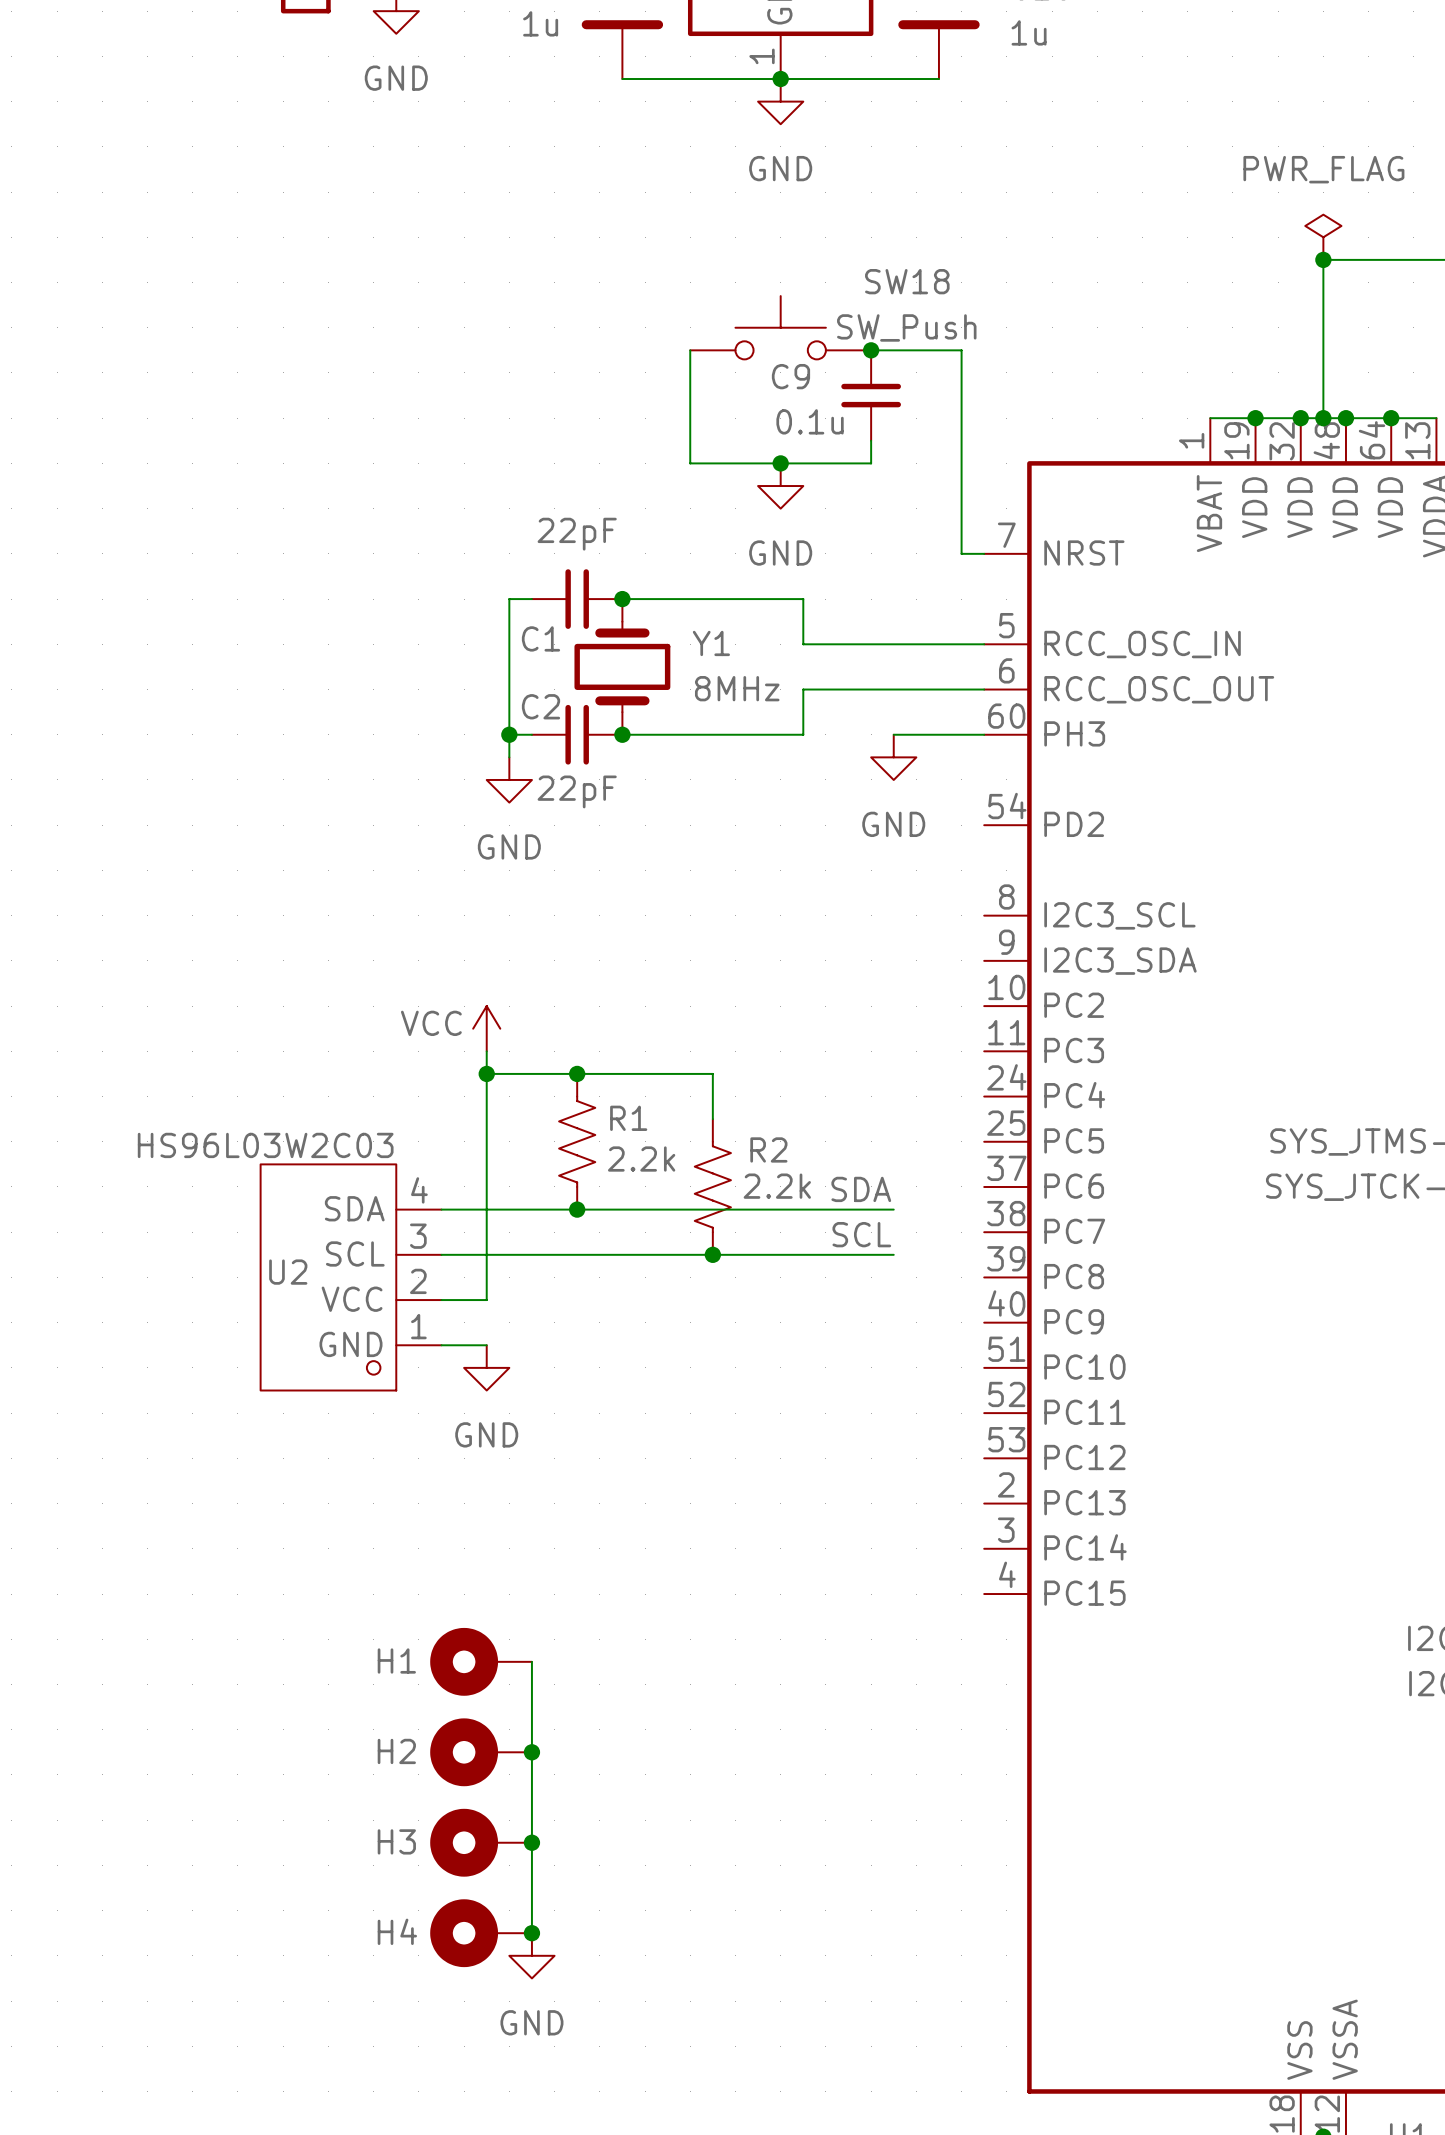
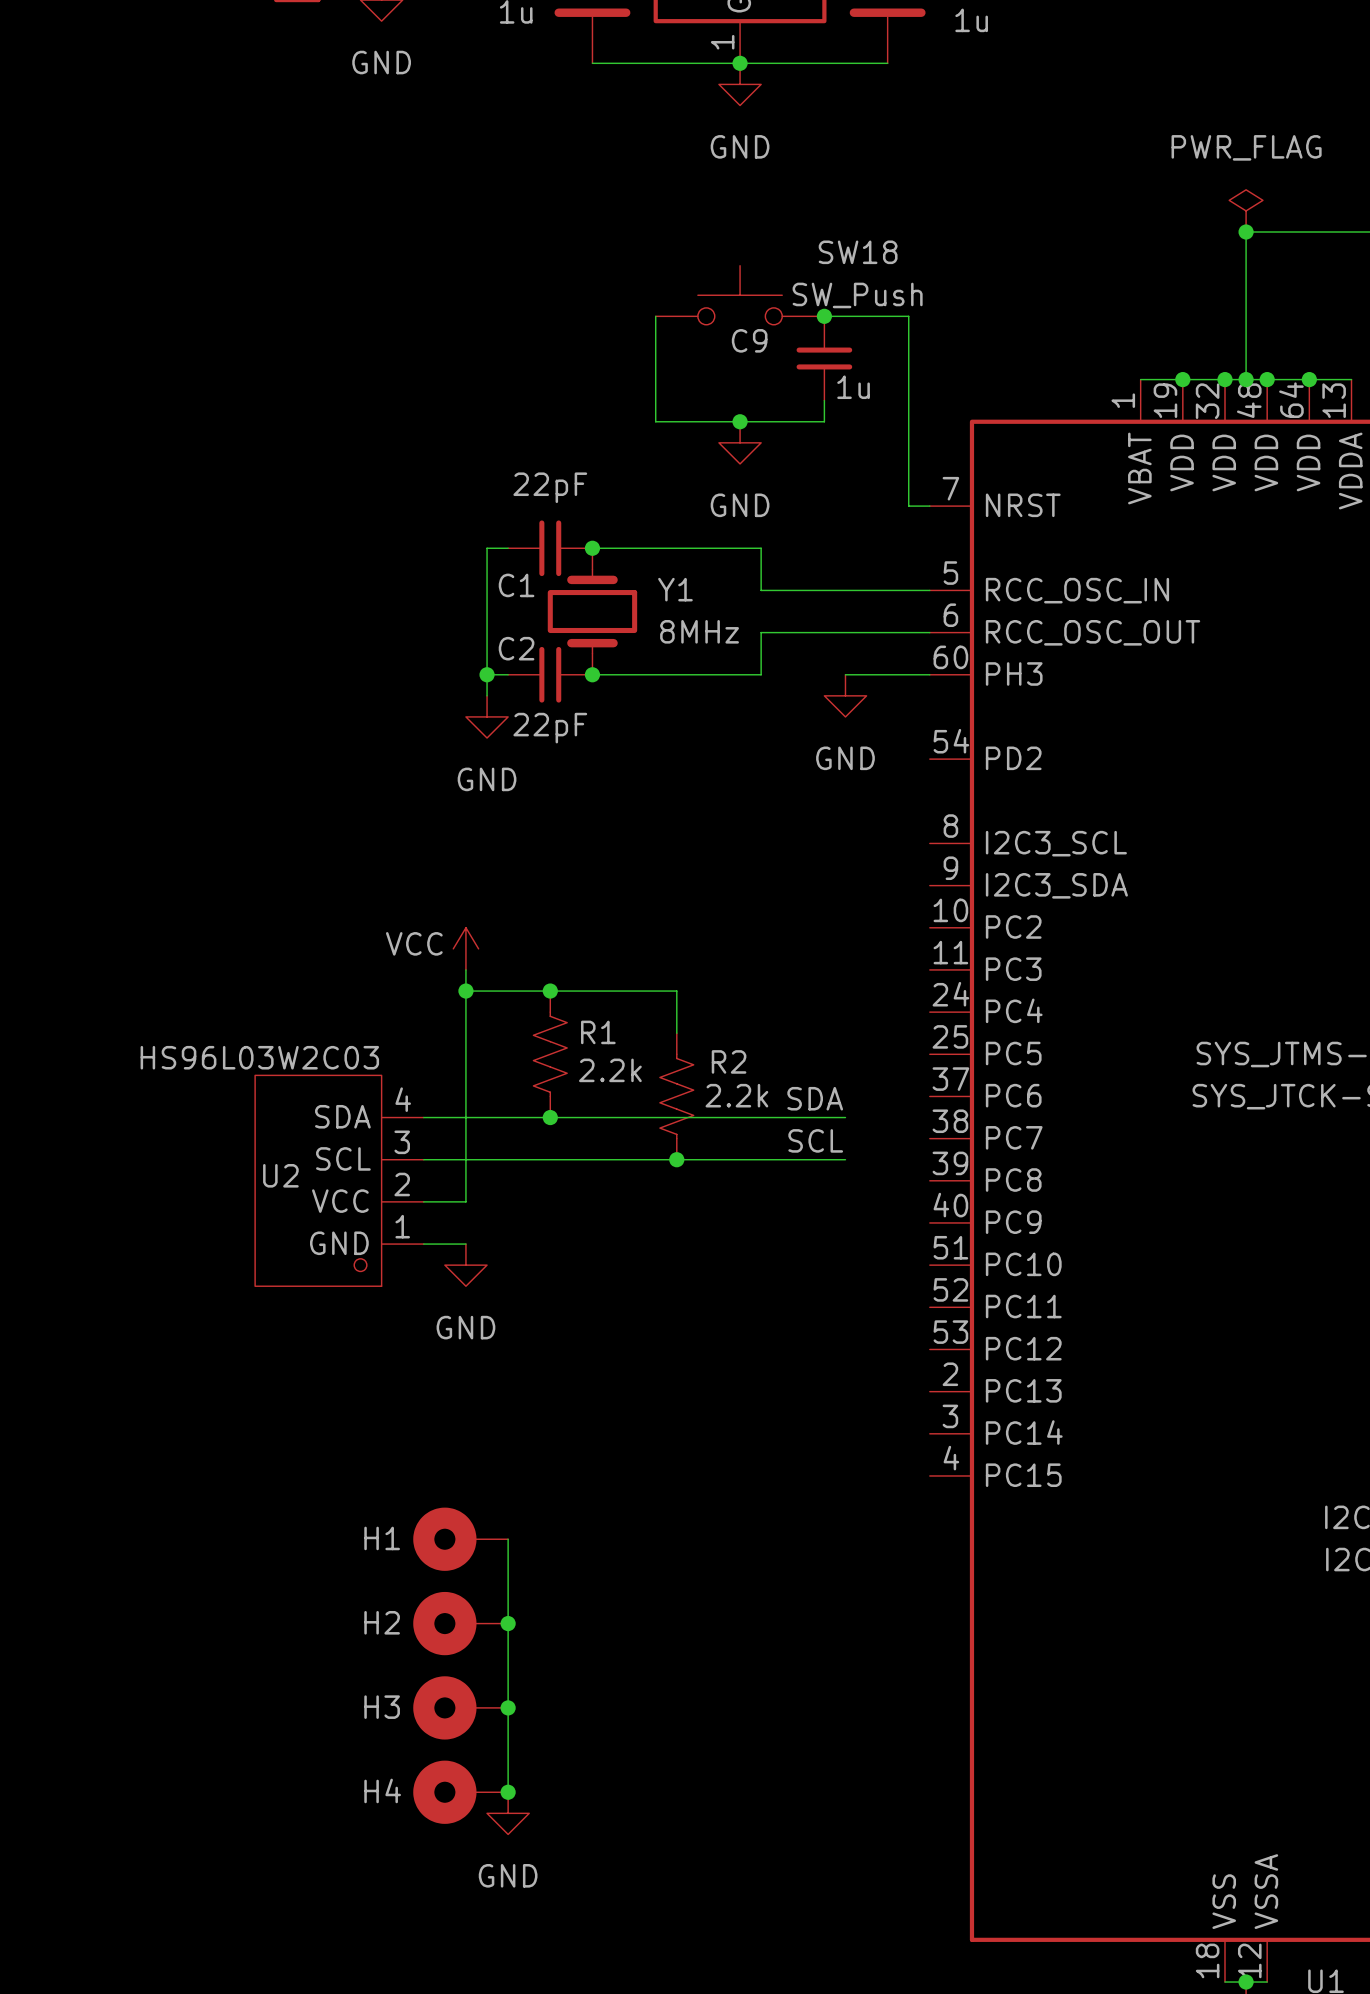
C9 value: 0.1u (810, 421) -> 1u (853, 387)

